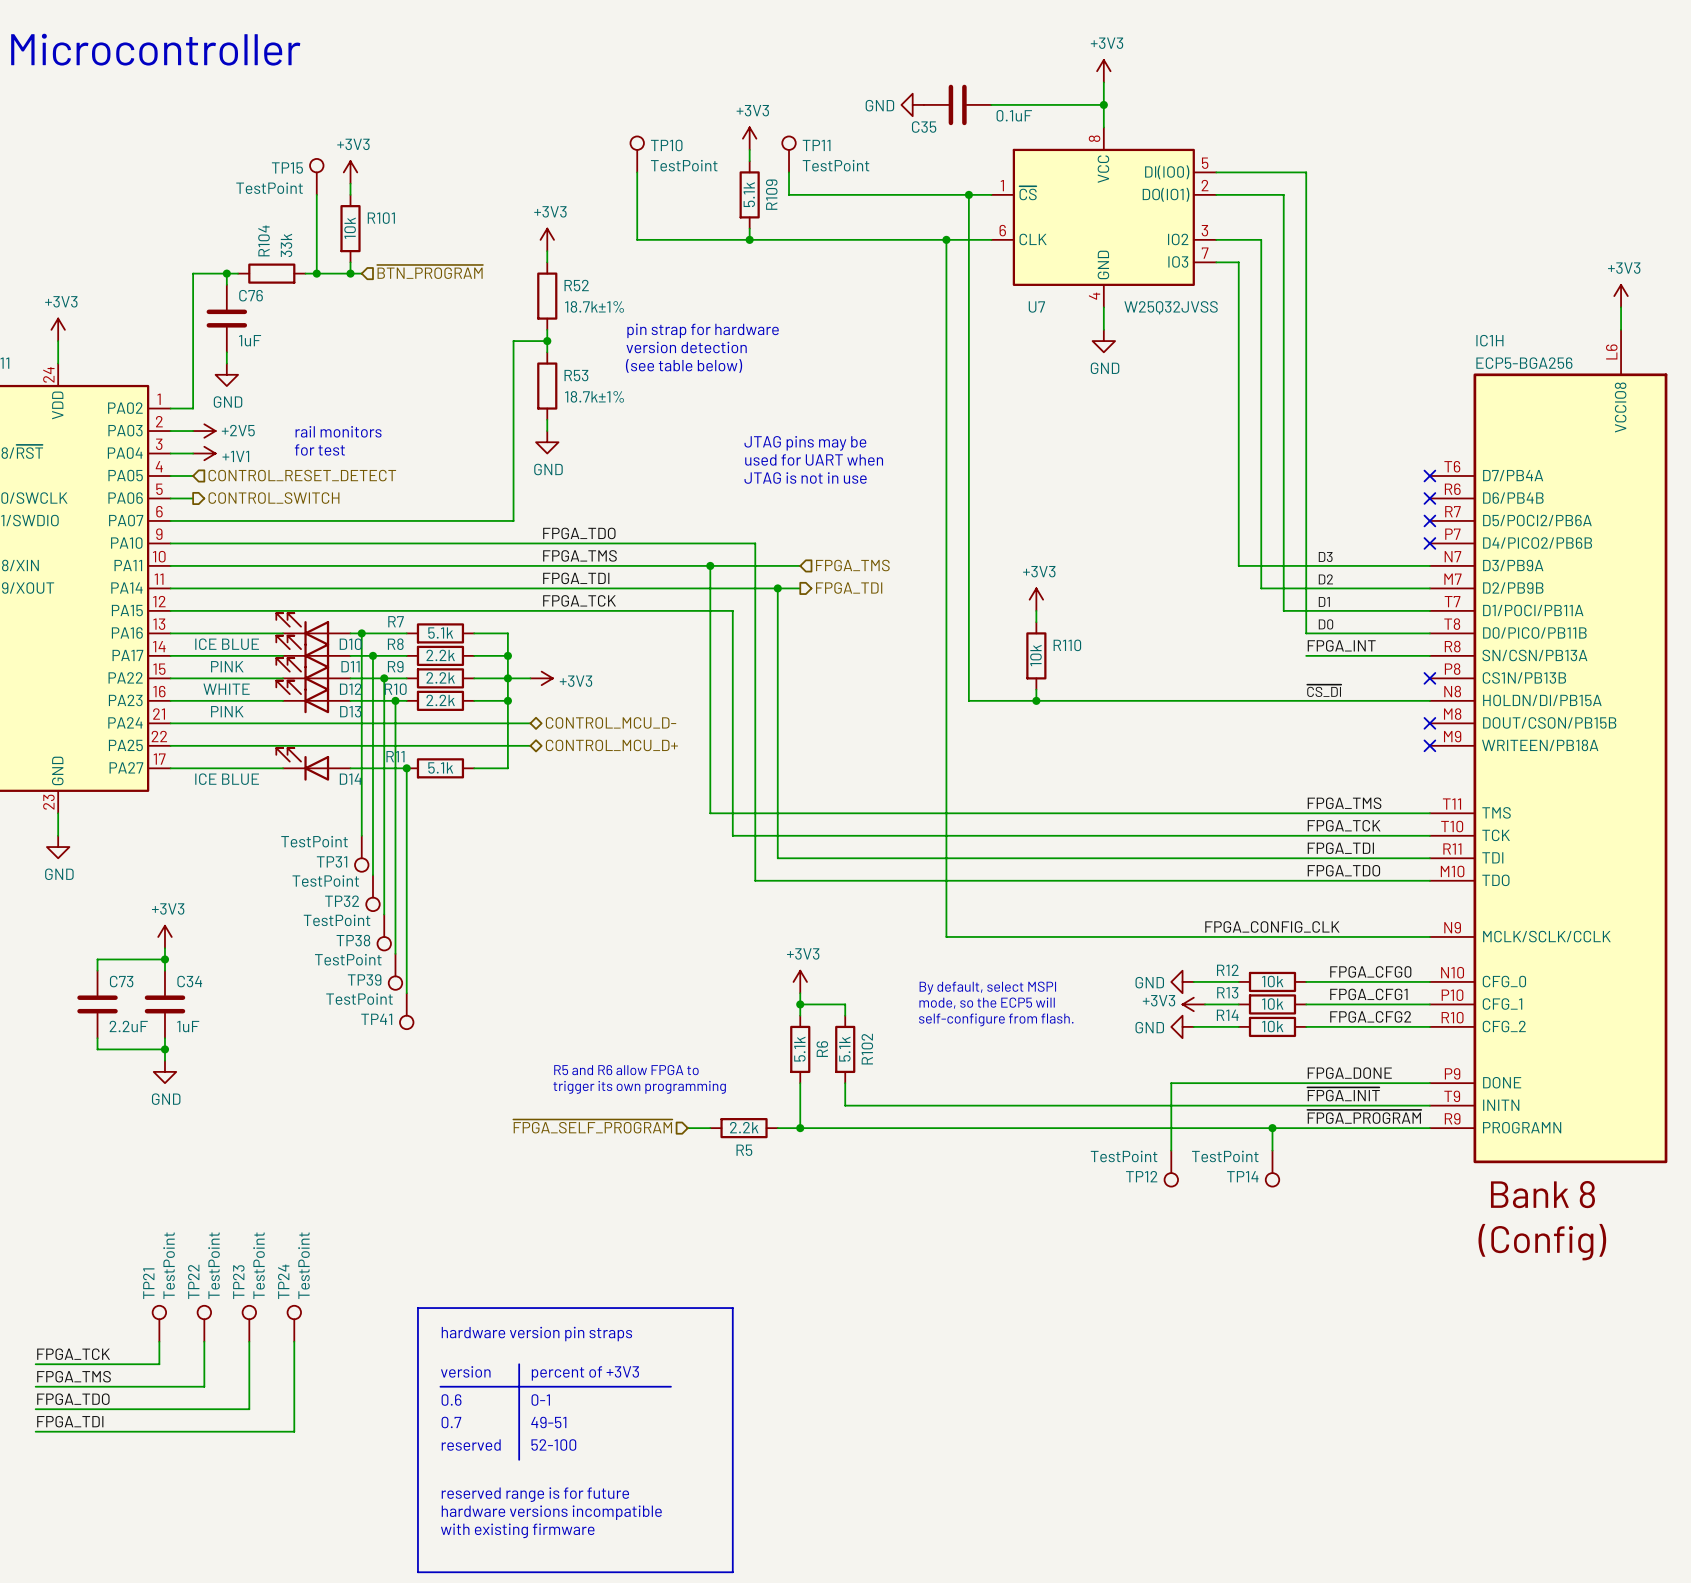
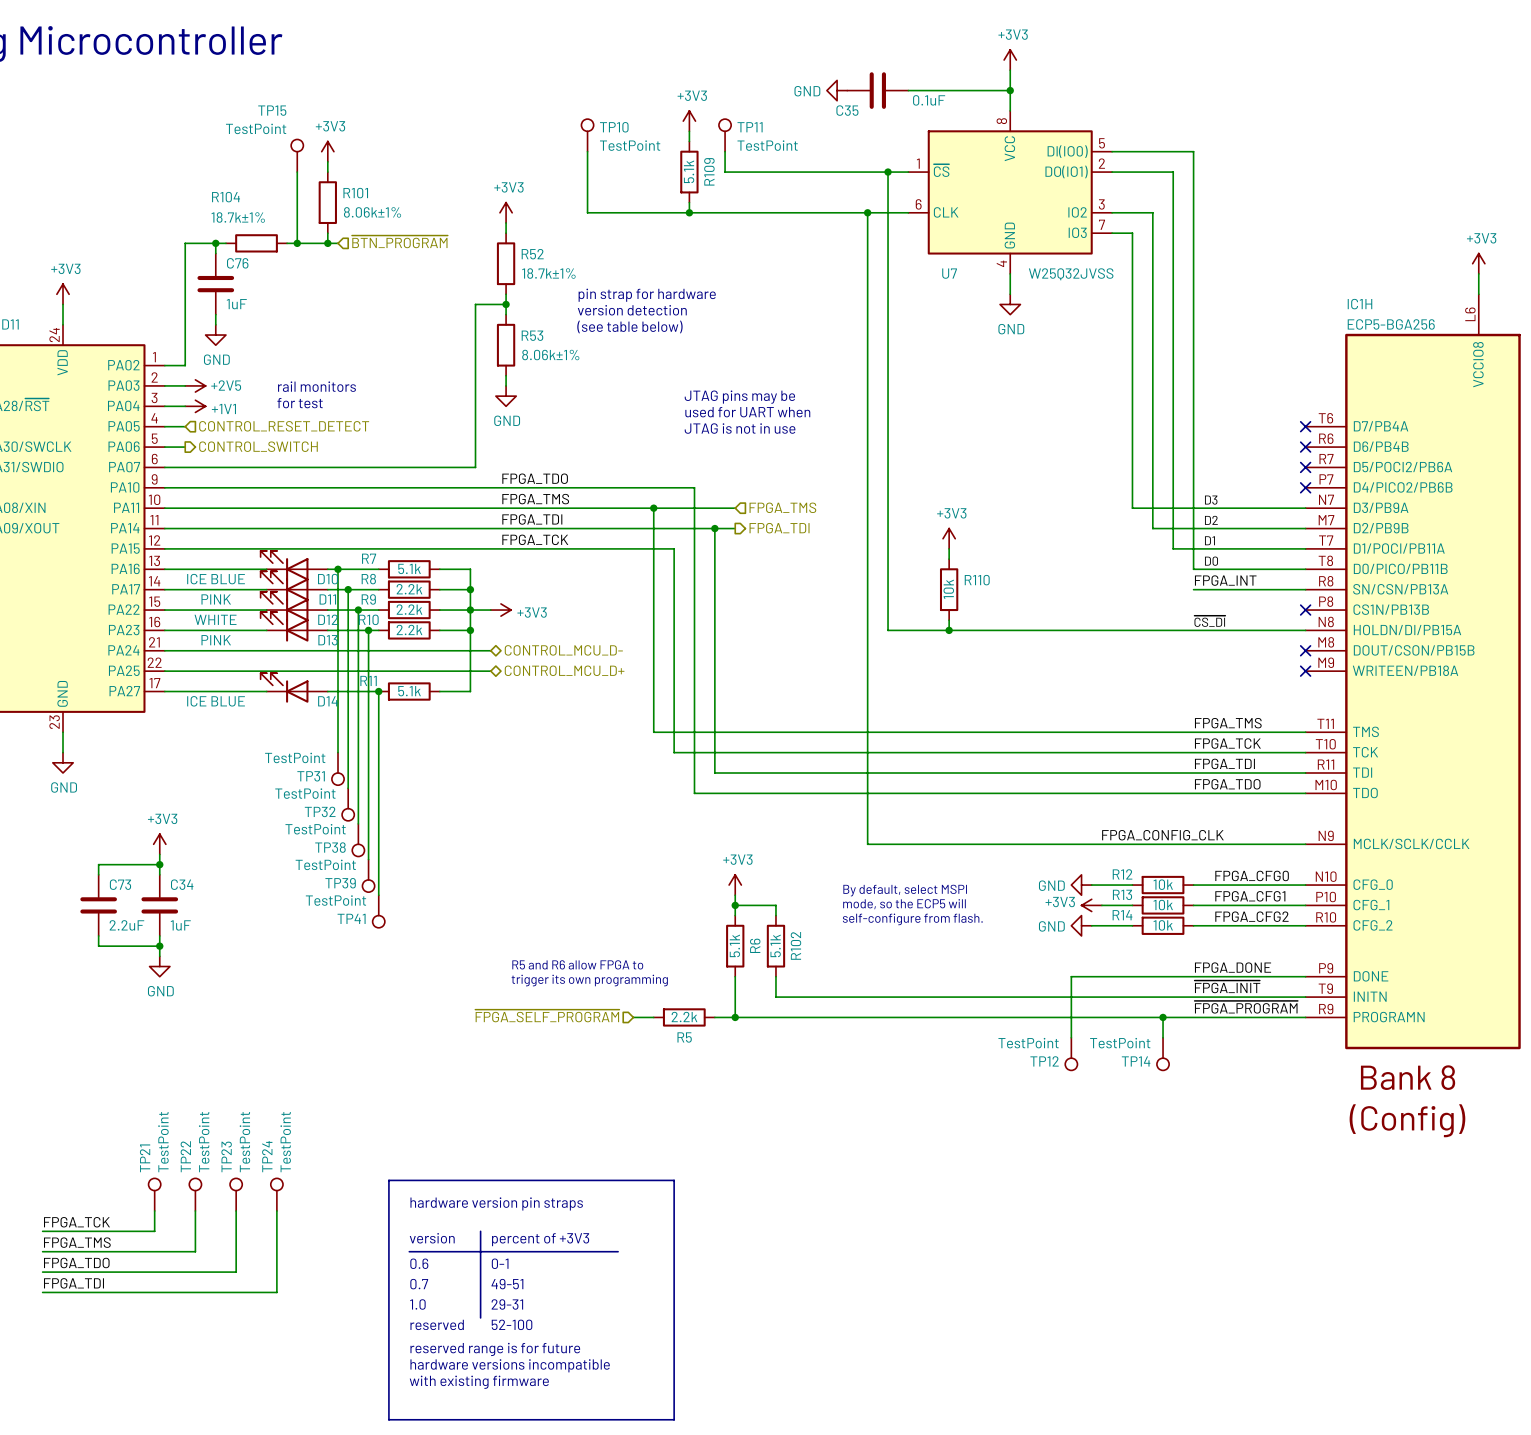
TP15 name position: TP15 (287, 167) -> TP15 (272, 110)
TP15 value position: TestPoint (269, 188) -> TestPoint (256, 128)
R101 value: 10k (350, 228) -> 8.06k±1% (372, 212)
R104 name rotation: 0° (264, 240) -> 90° clockwise (226, 197)
R104 value: 33k (286, 245) -> 18.7k±1% (238, 217)
R53 value: 18.7k±1% (594, 396) -> 8.06k±1% (550, 355)
text: 52-100 (553, 1444) -> 29-31 (507, 1304)
text: reserved (471, 1445) -> 1.0 (417, 1304)
text: none -> reserved (437, 1324)
text: none -> 52-100 (512, 1324)

